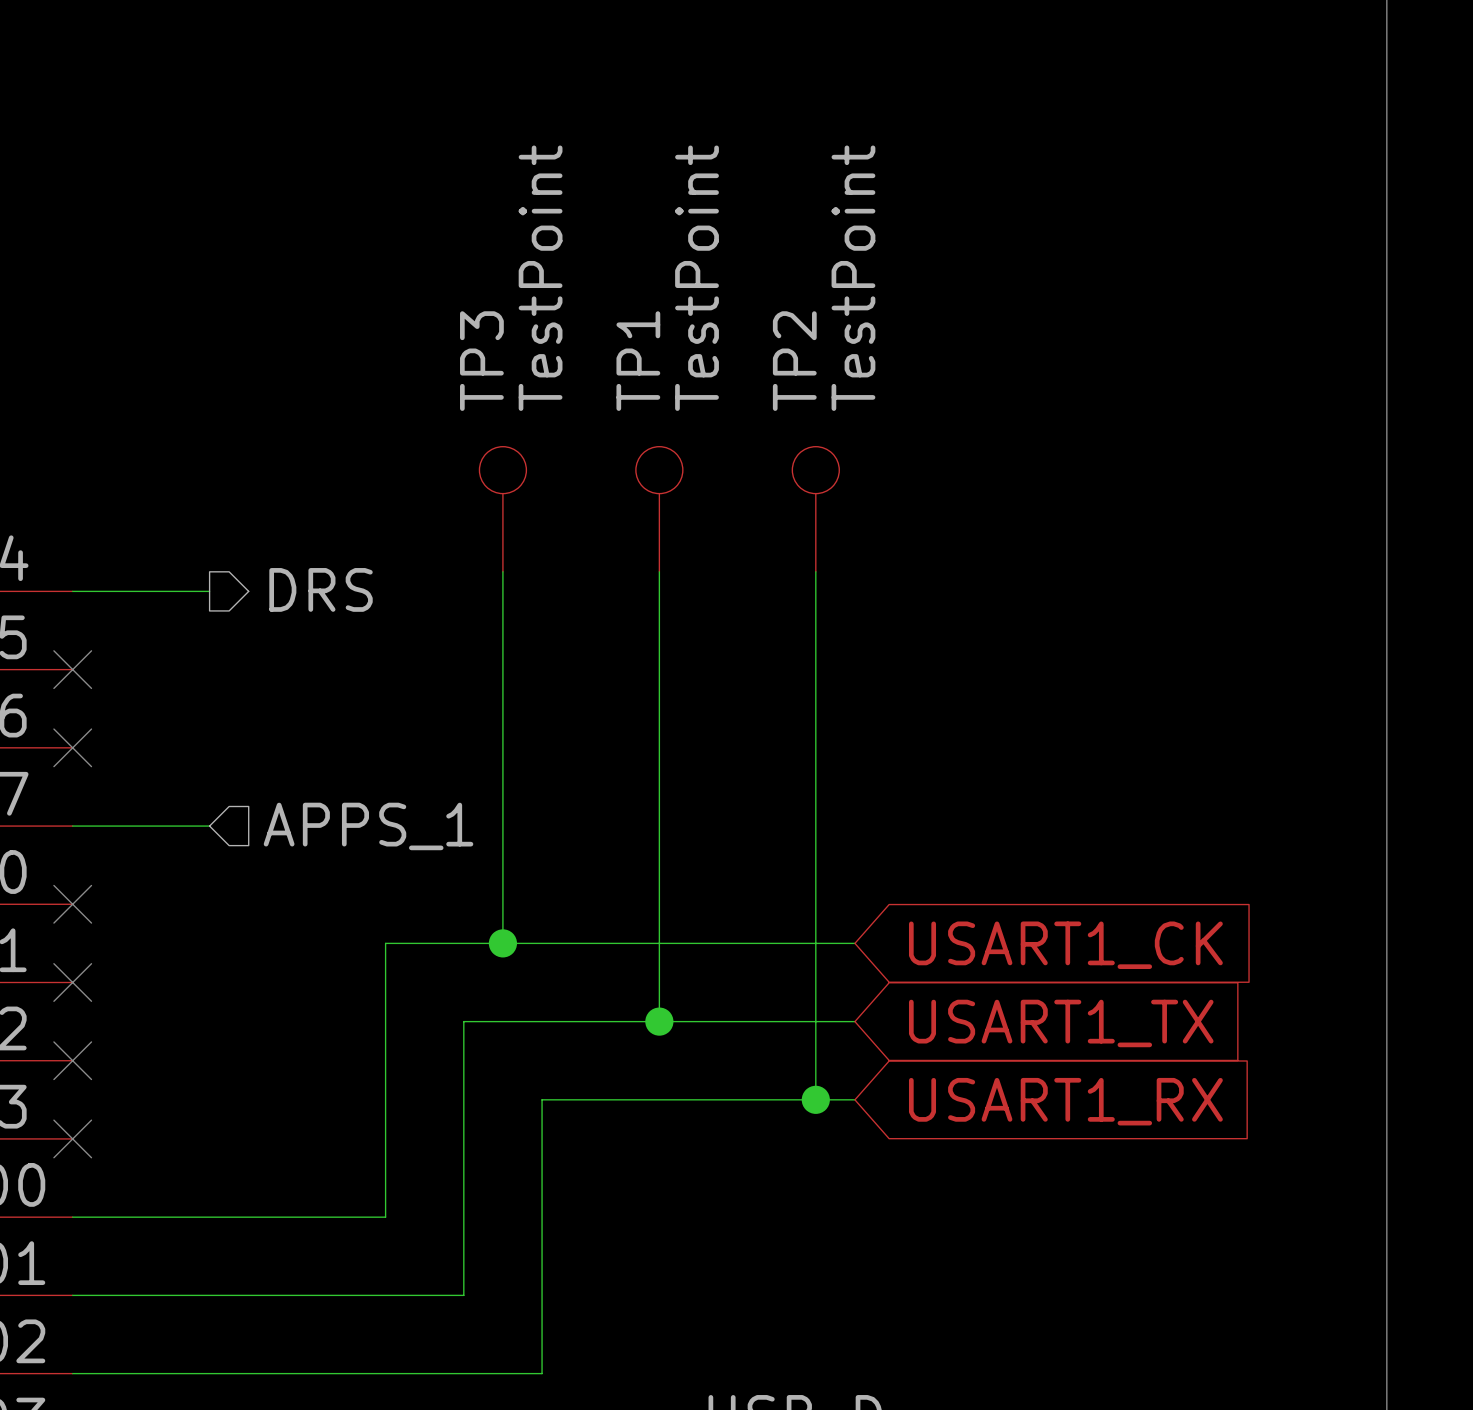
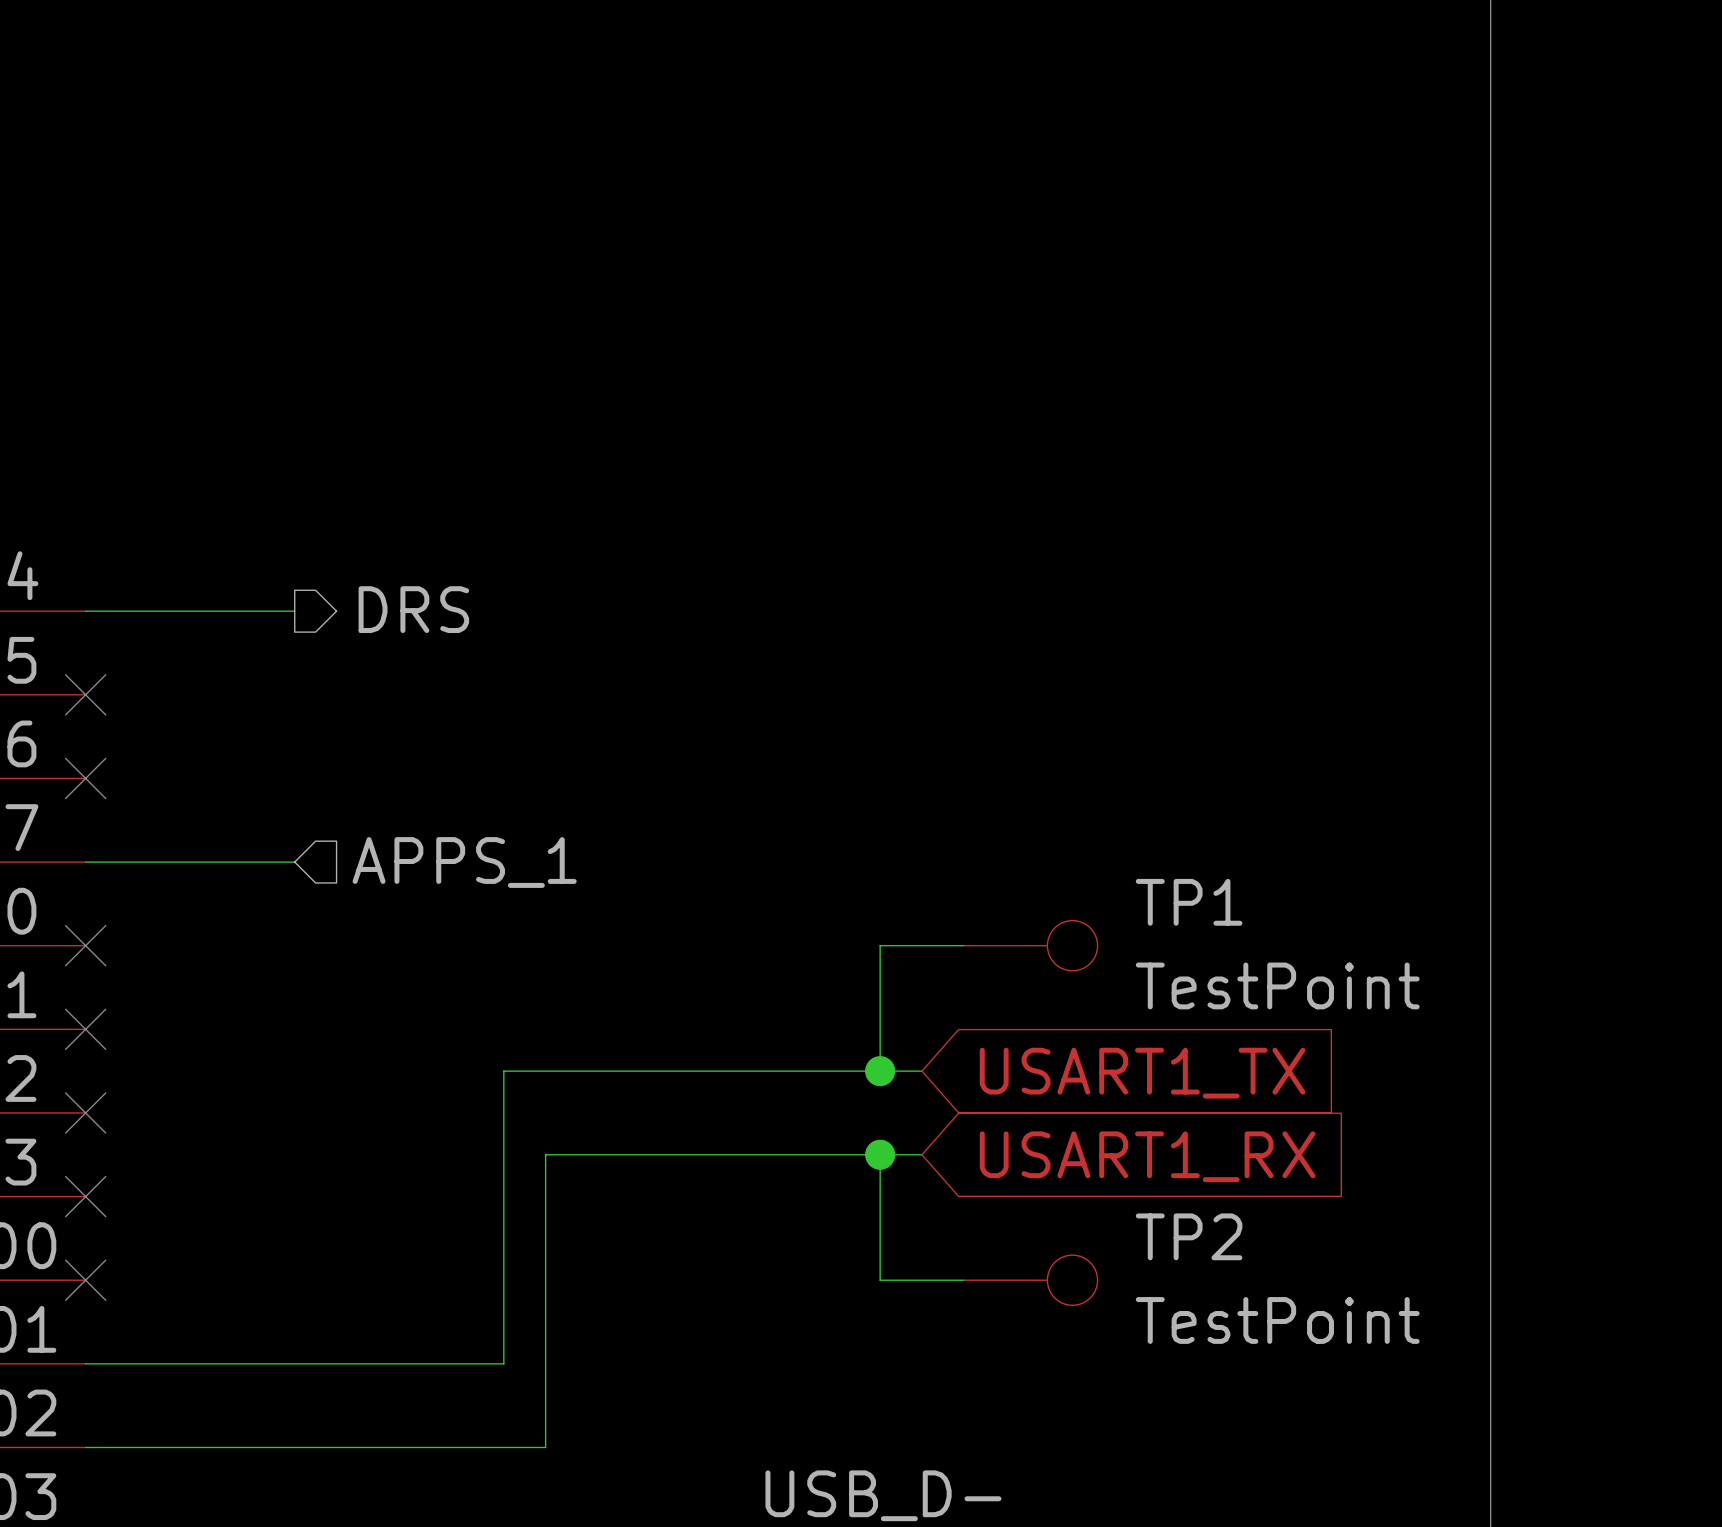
TP1 rotation: 0° (659, 470) -> 90° clockwise (1072, 945)
TP2 rotation: 0° (815, 470) -> 90° clockwise (1072, 1280)
TP3: TestPoint (502, 509) -> none
TP1 position: (659, 509) -> (1030, 945)
TP2 position: (815, 509) -> (1030, 1280)
wire: (502, 571) (502, 943) -> none
wire: (659, 571) (659, 1021) -> none
wire: (815, 571) (815, 904) -> (963, 945) (880, 945)
hierarchical label position: DRS (321, 589) -> DRS (413, 609)
wire: none -> (232, 611) (294, 611)
wire: none -> (232, 862) (294, 862)
hierarchical label position: APPS_1 (368, 826) -> APPS_1 (464, 862)
junction: (502, 943) -> none
wire: (854, 943) (385, 943) (385, 1217) (72, 1217) -> none
global label: USART1_CK (1065, 945) -> none
junction position: (659, 1021) -> (880, 1071)
wire: (815, 1021) (815, 1099) -> (963, 1280) (880, 1280) (880, 1154)
wire: (542, 1099) (542, 1373) (502, 1373) -> (587, 1154) (545, 1154) (545, 1447)
no-connect mark: none -> (85, 1280)

